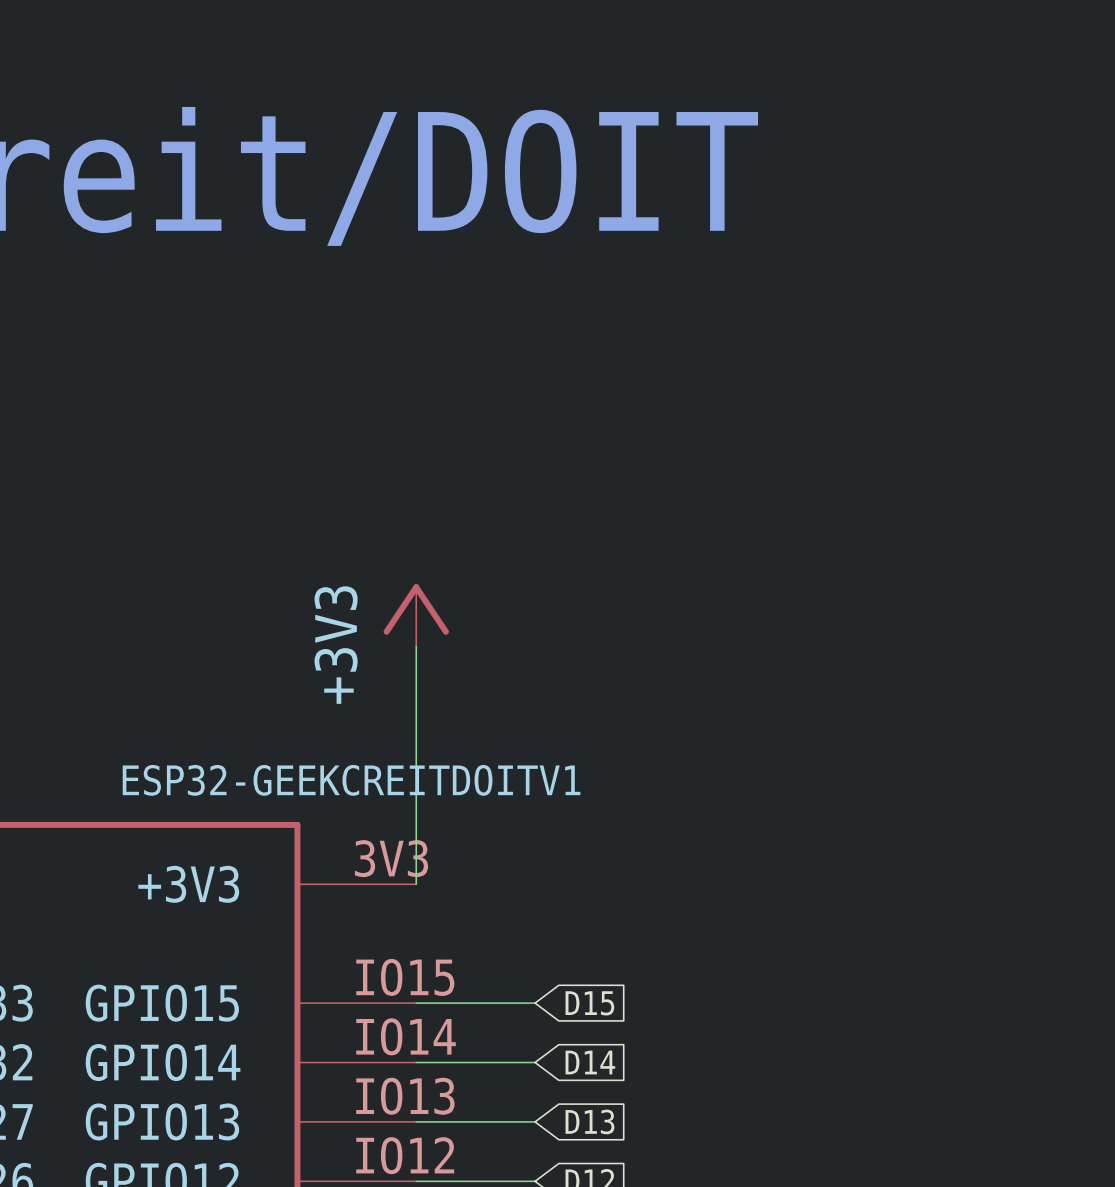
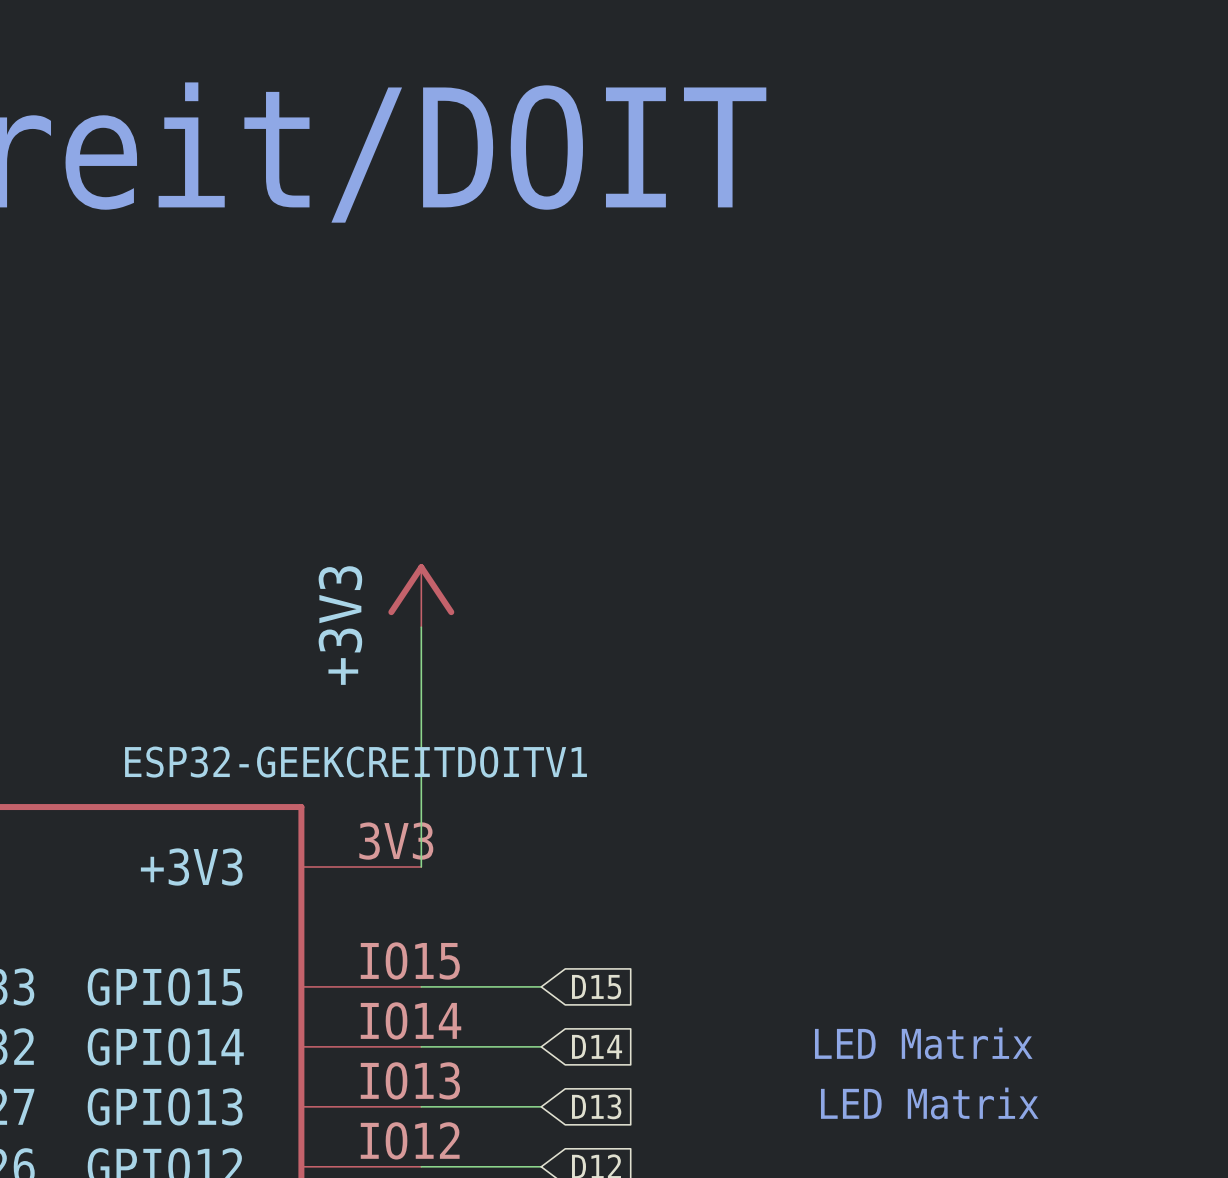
text: none -> LED Matrix (923, 1043)
text: none -> LED Matrix (929, 1103)

